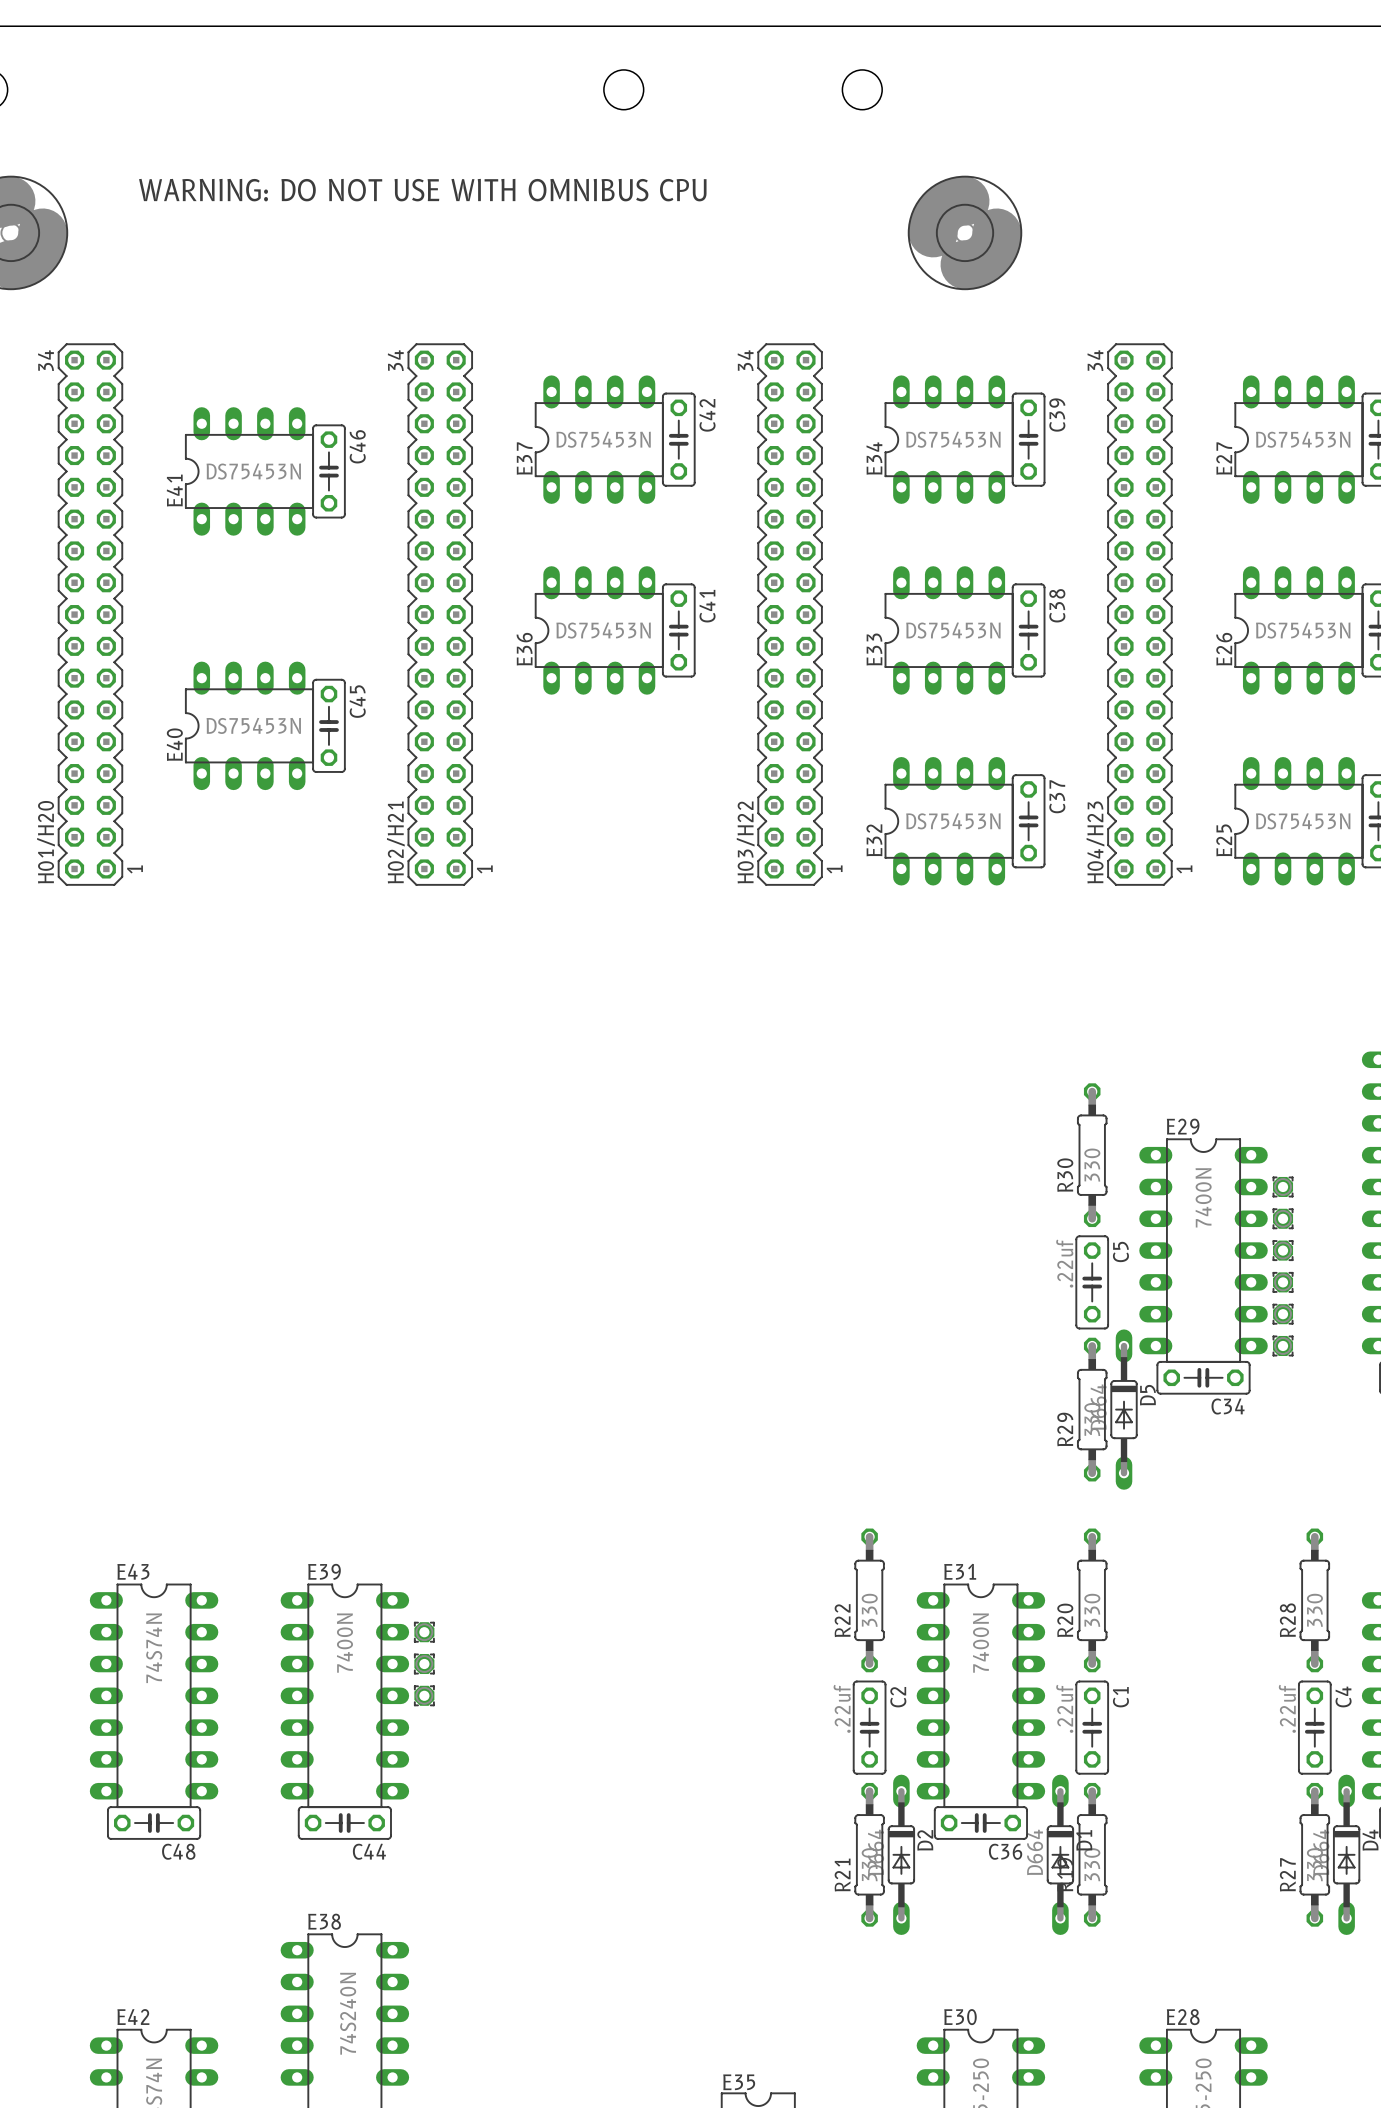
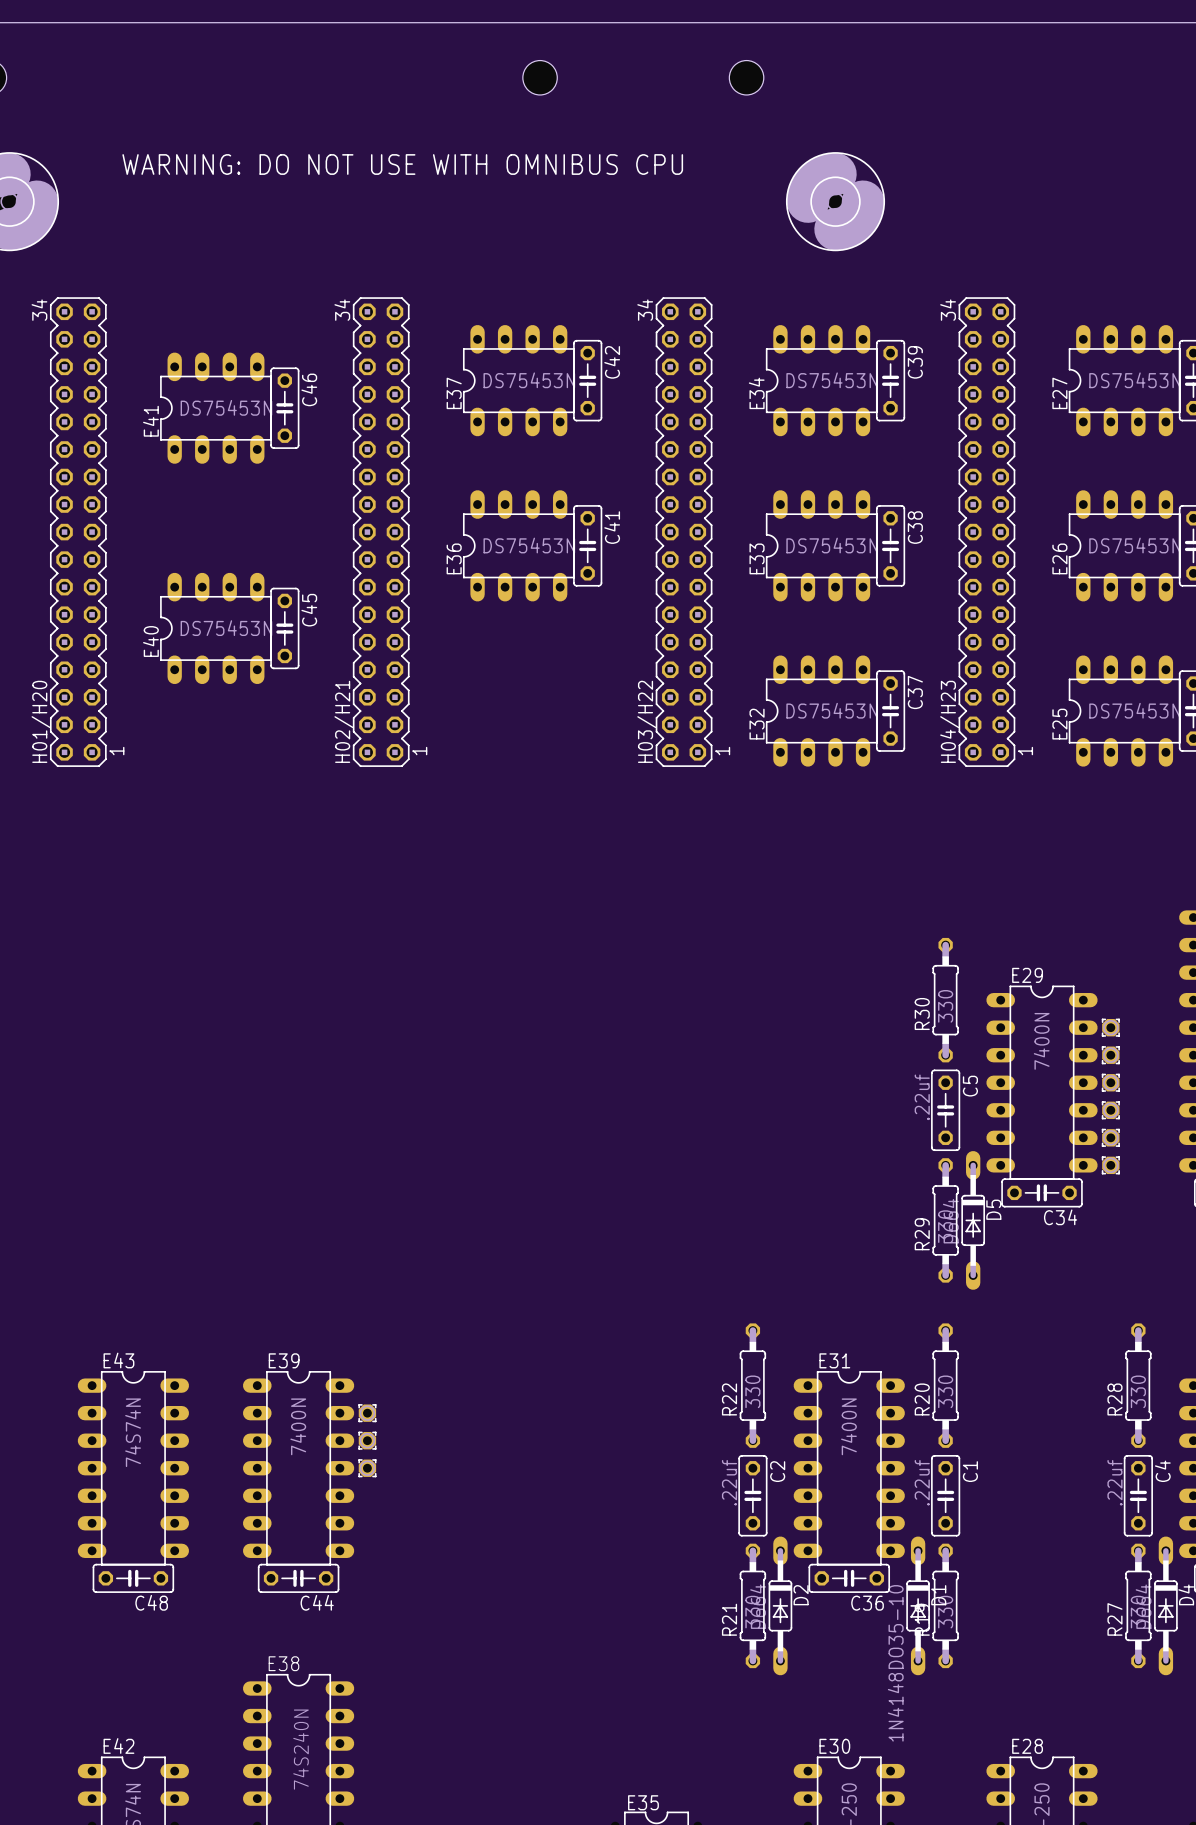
D1 value: D664 (1035, 1852) -> 1N4148DO35-10 (895, 1663)

